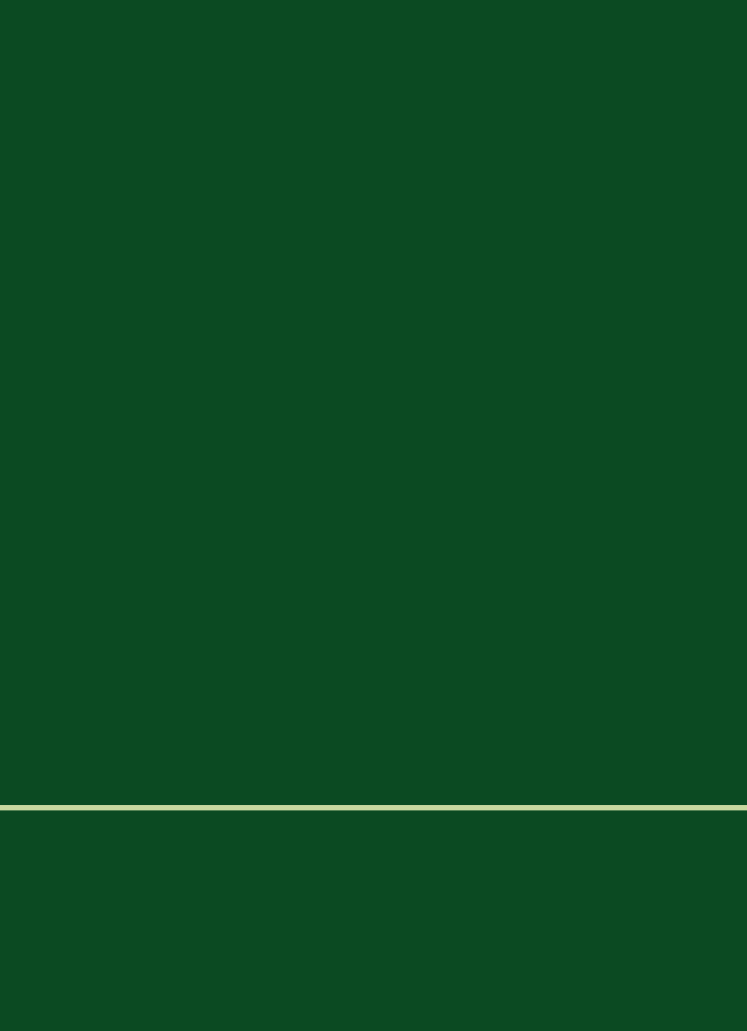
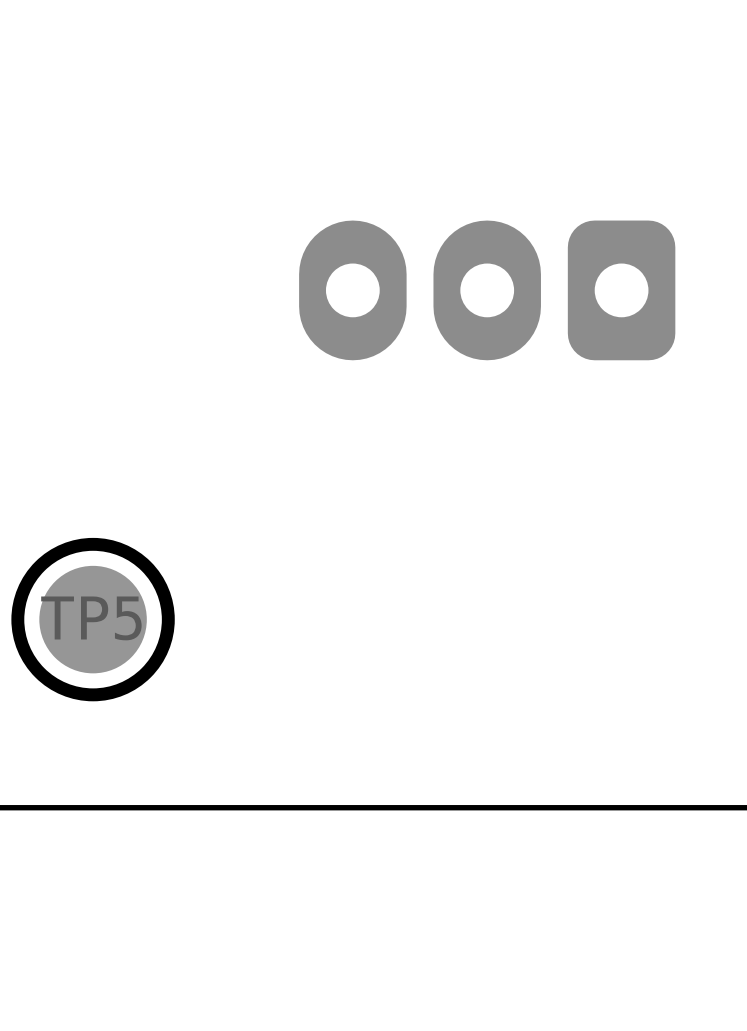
part: none -> (487, 290)
part: none -> (93, 619)

